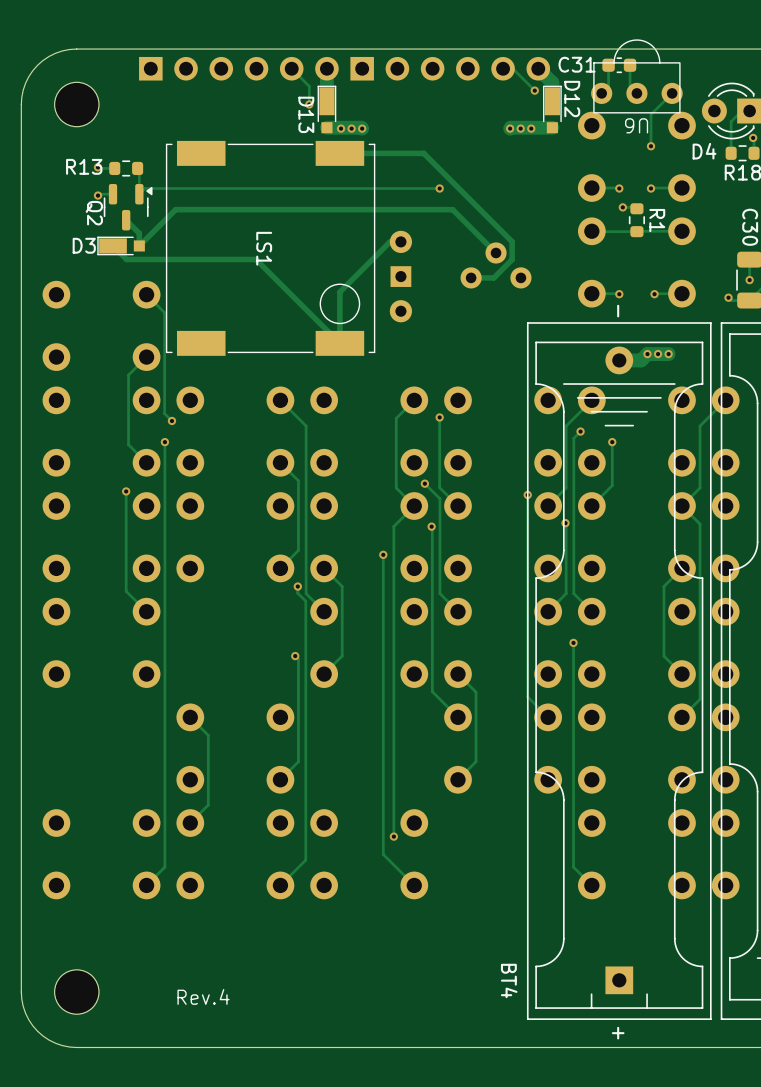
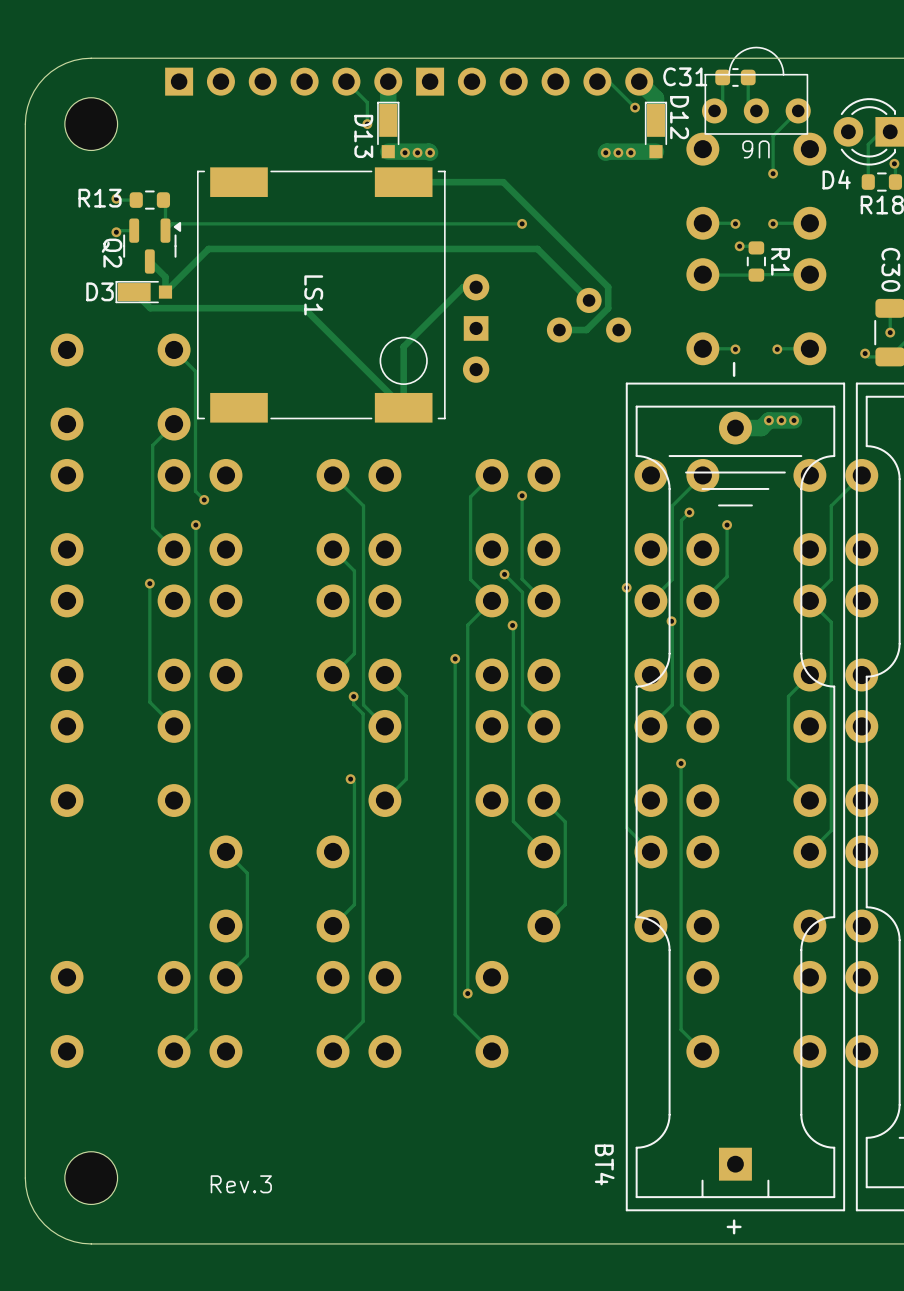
text: Rev.4 (203, 996) -> Rev.3 (241, 1184)

